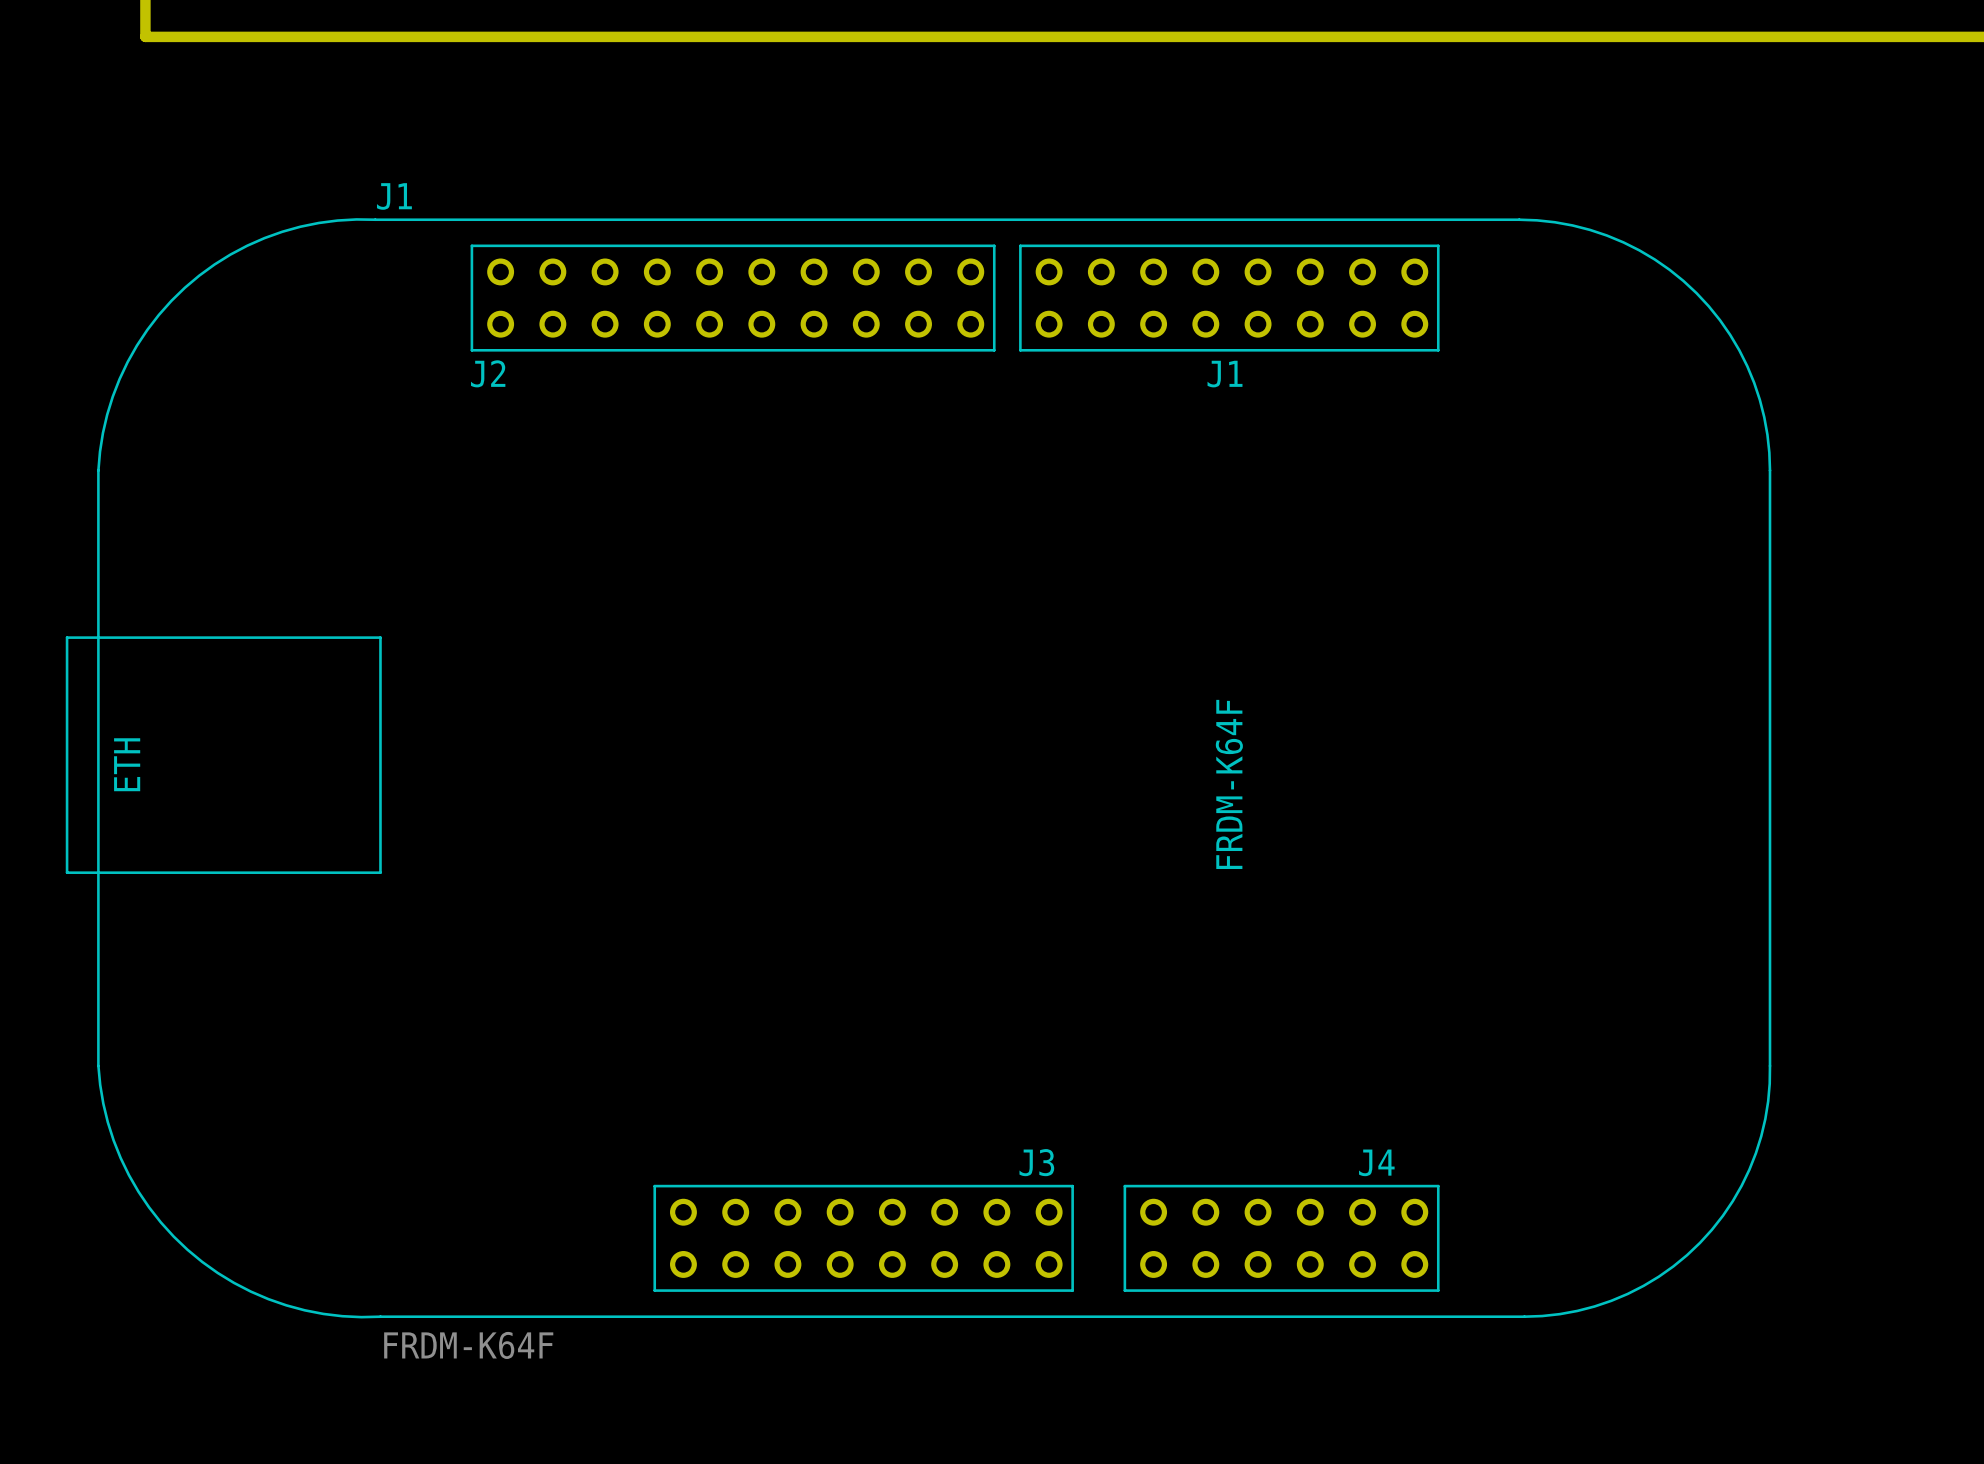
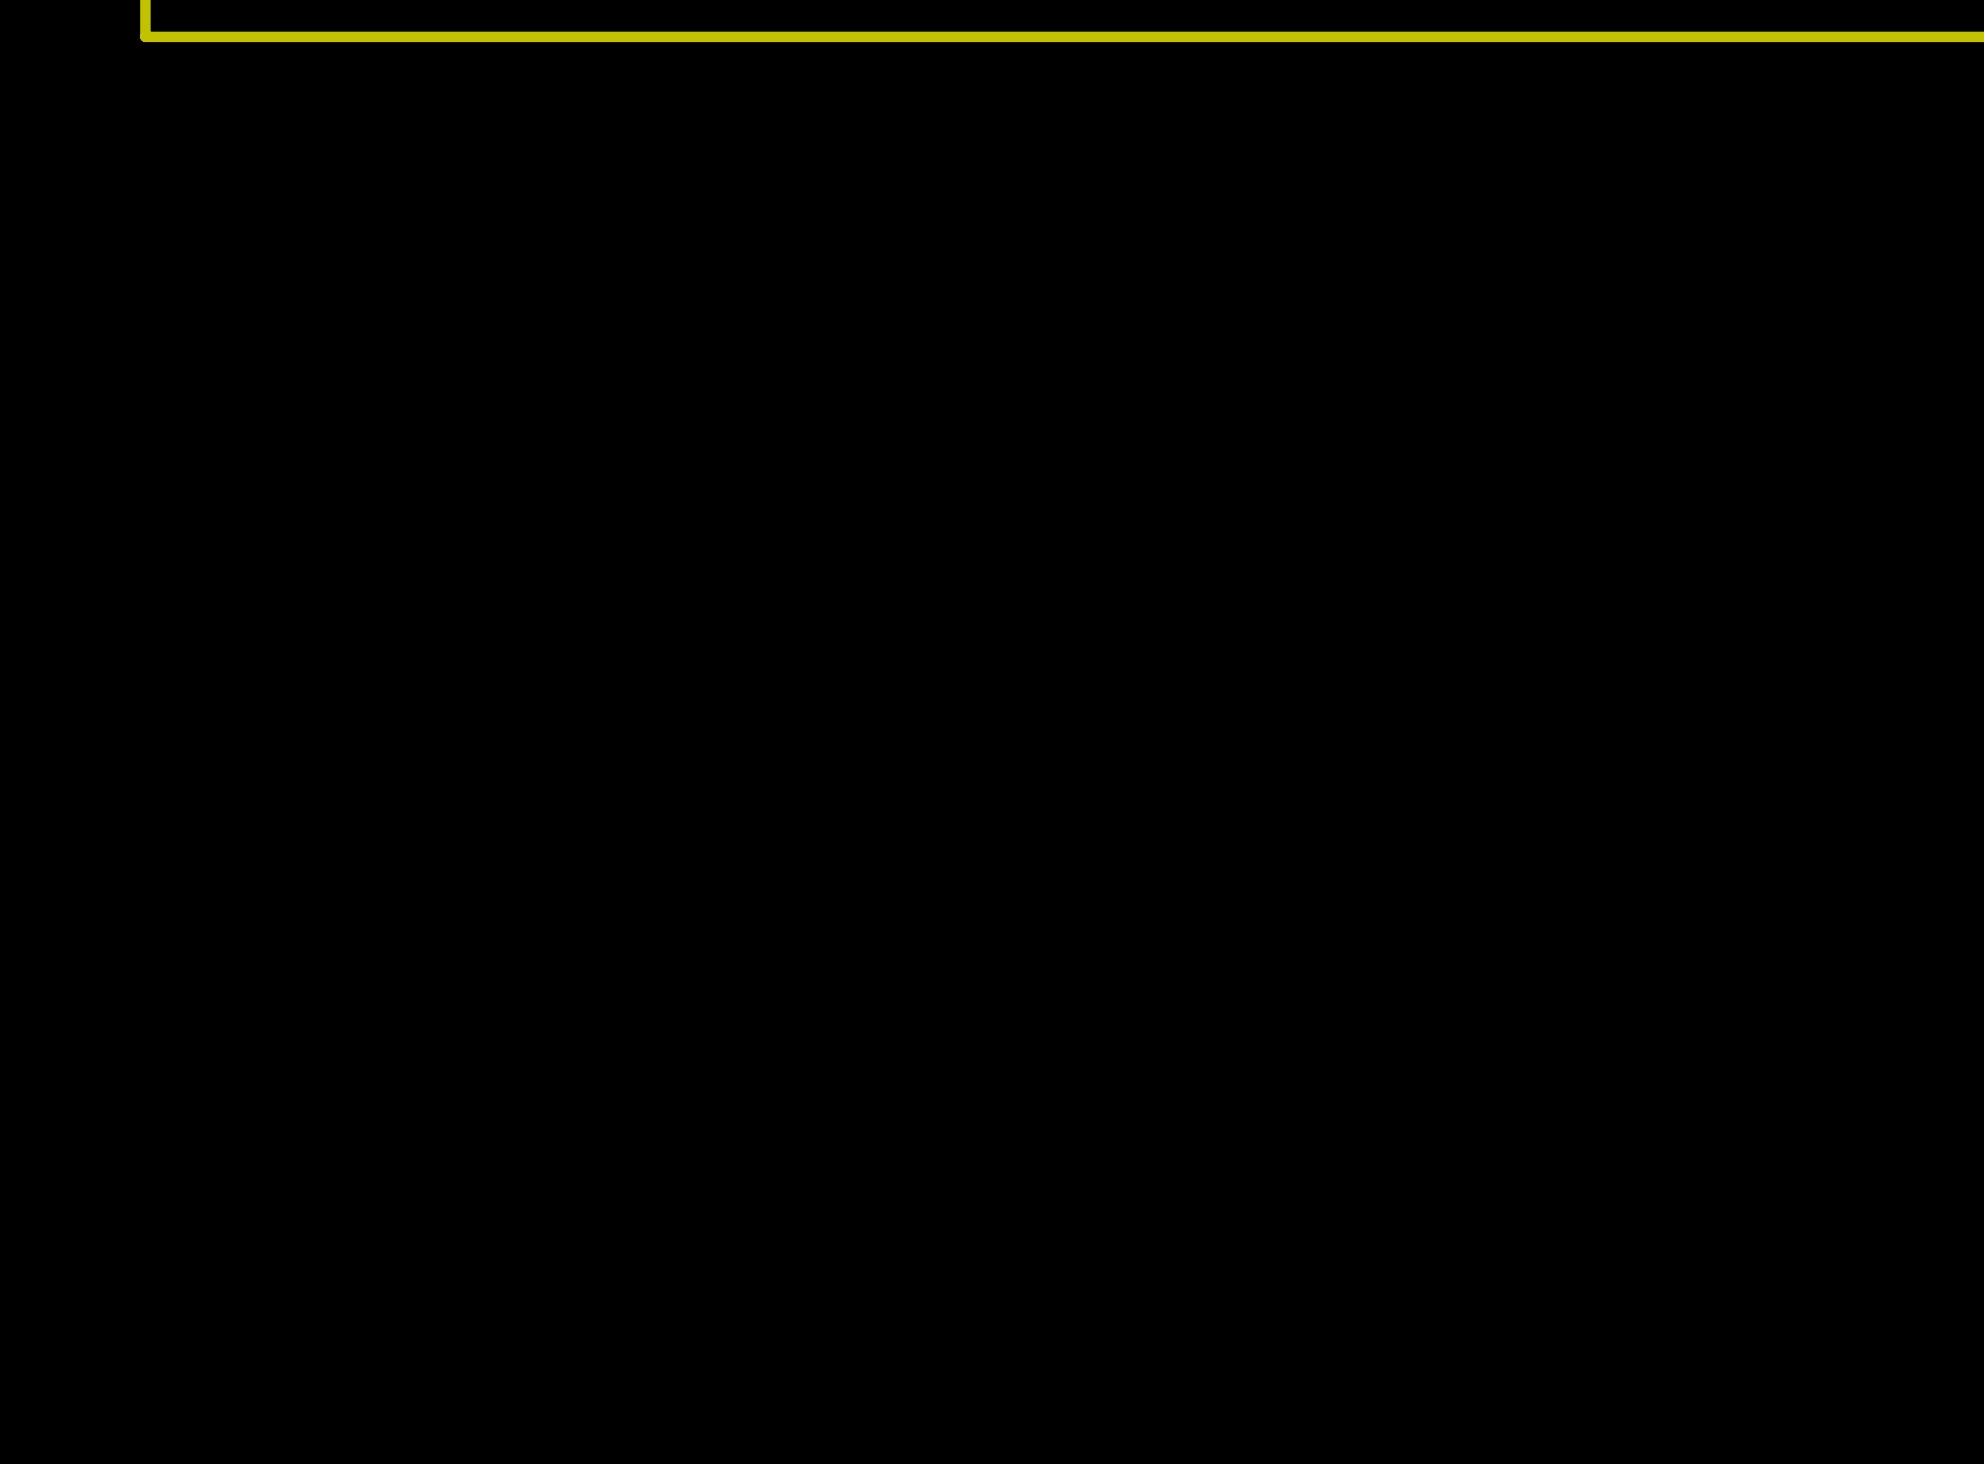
J1: FRDM-K64F (918, 768) -> none

